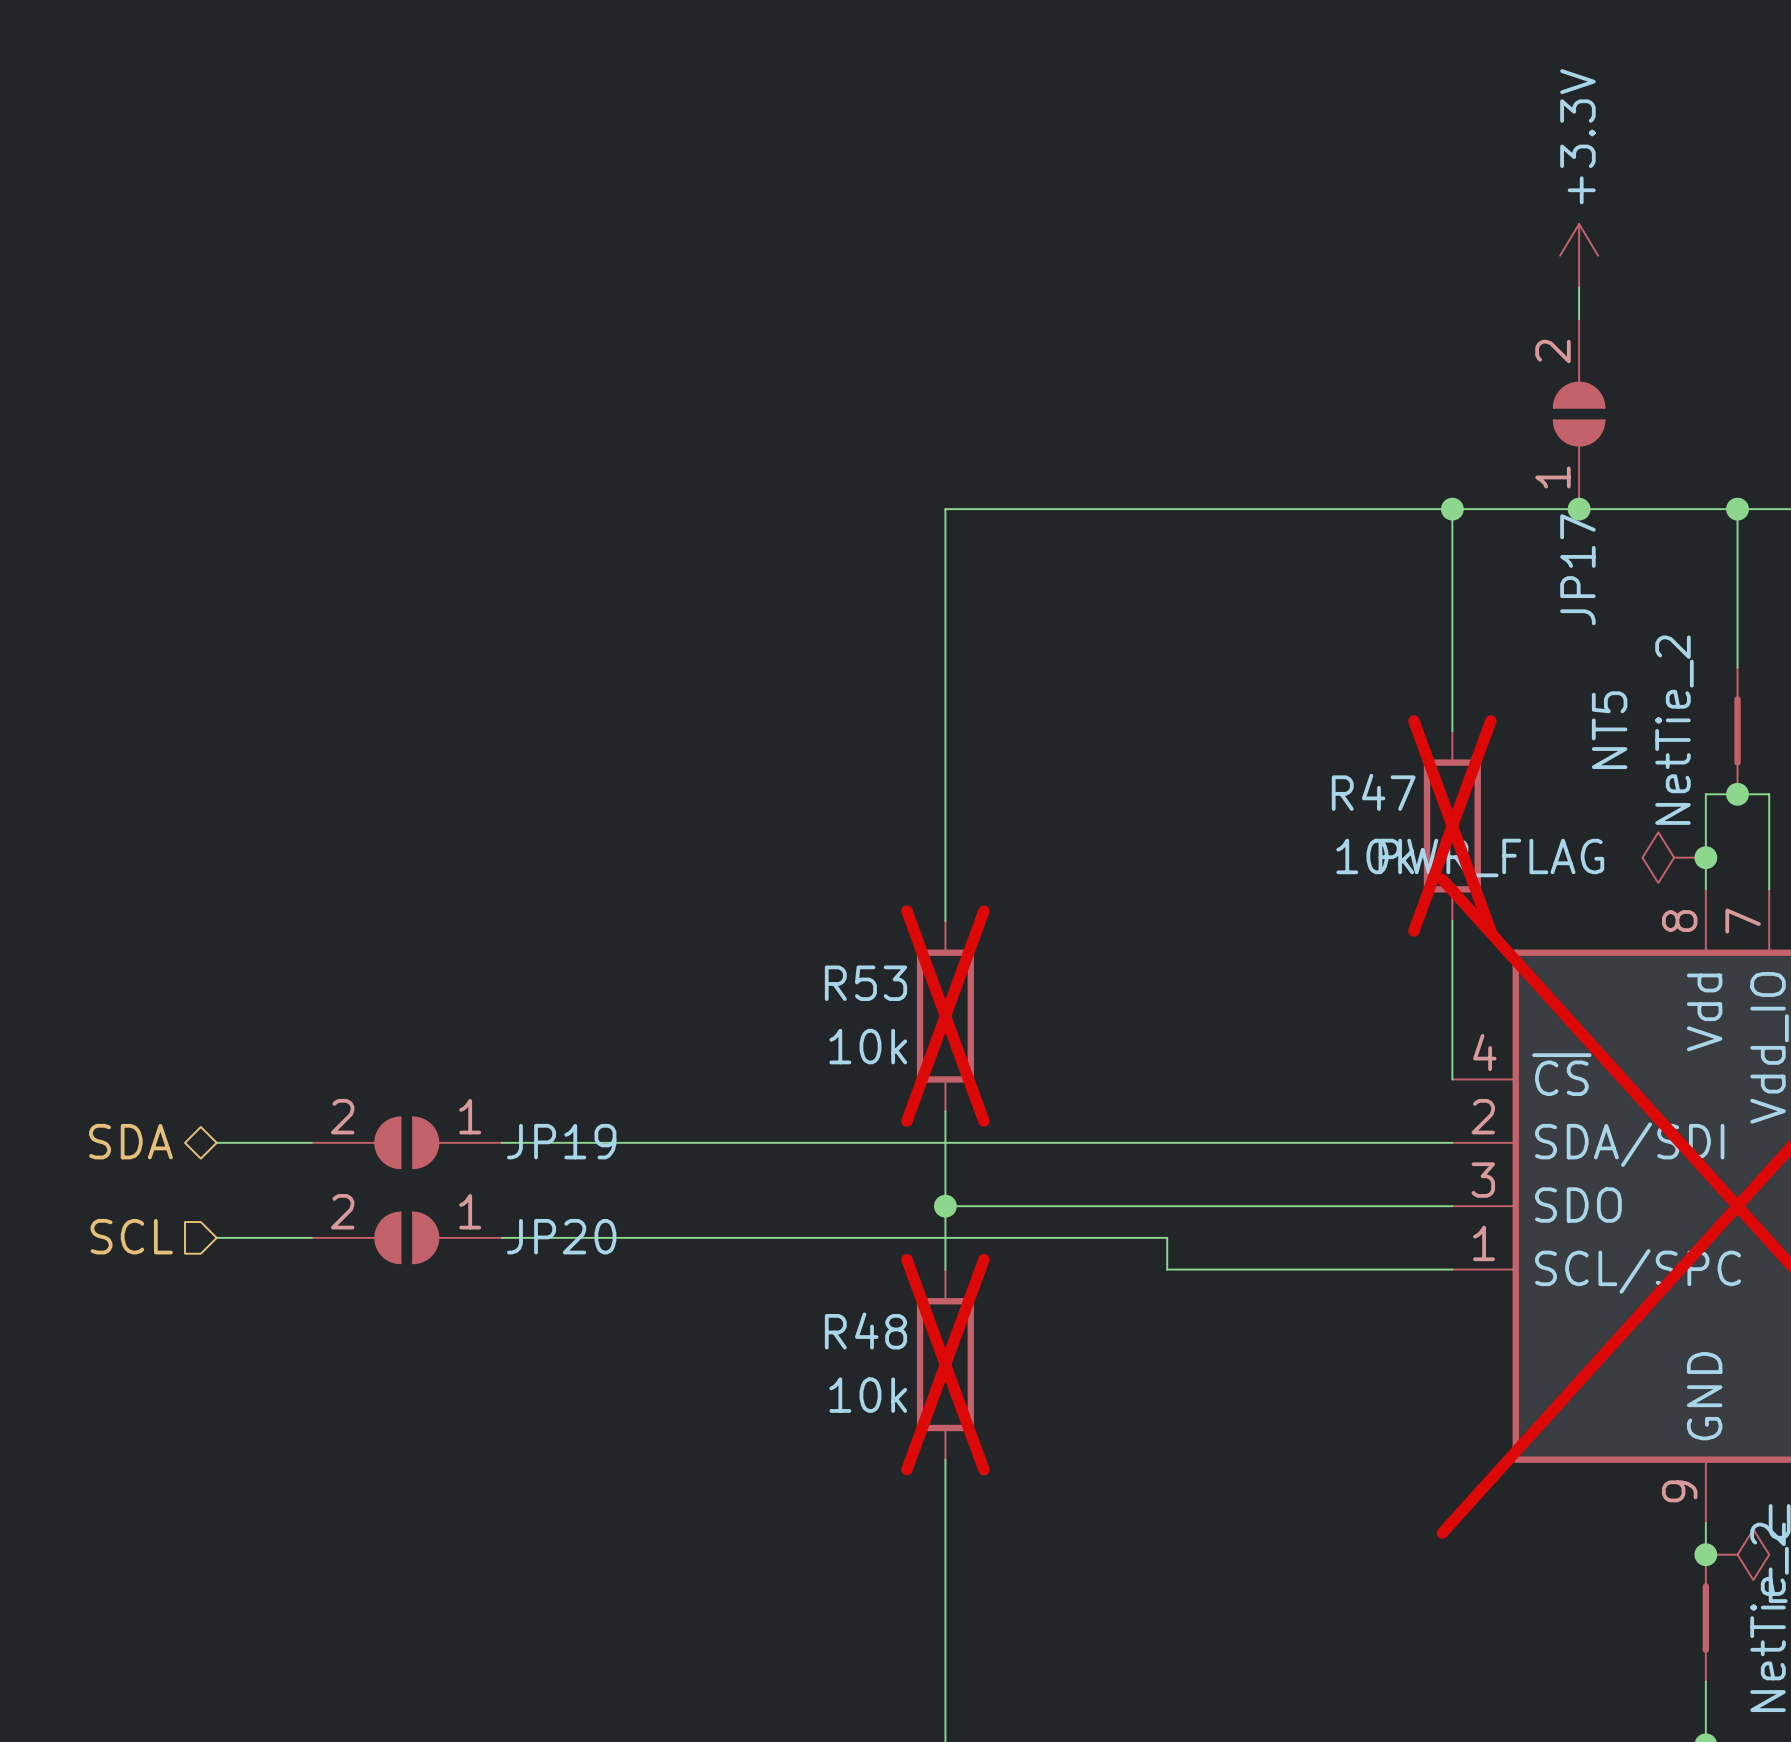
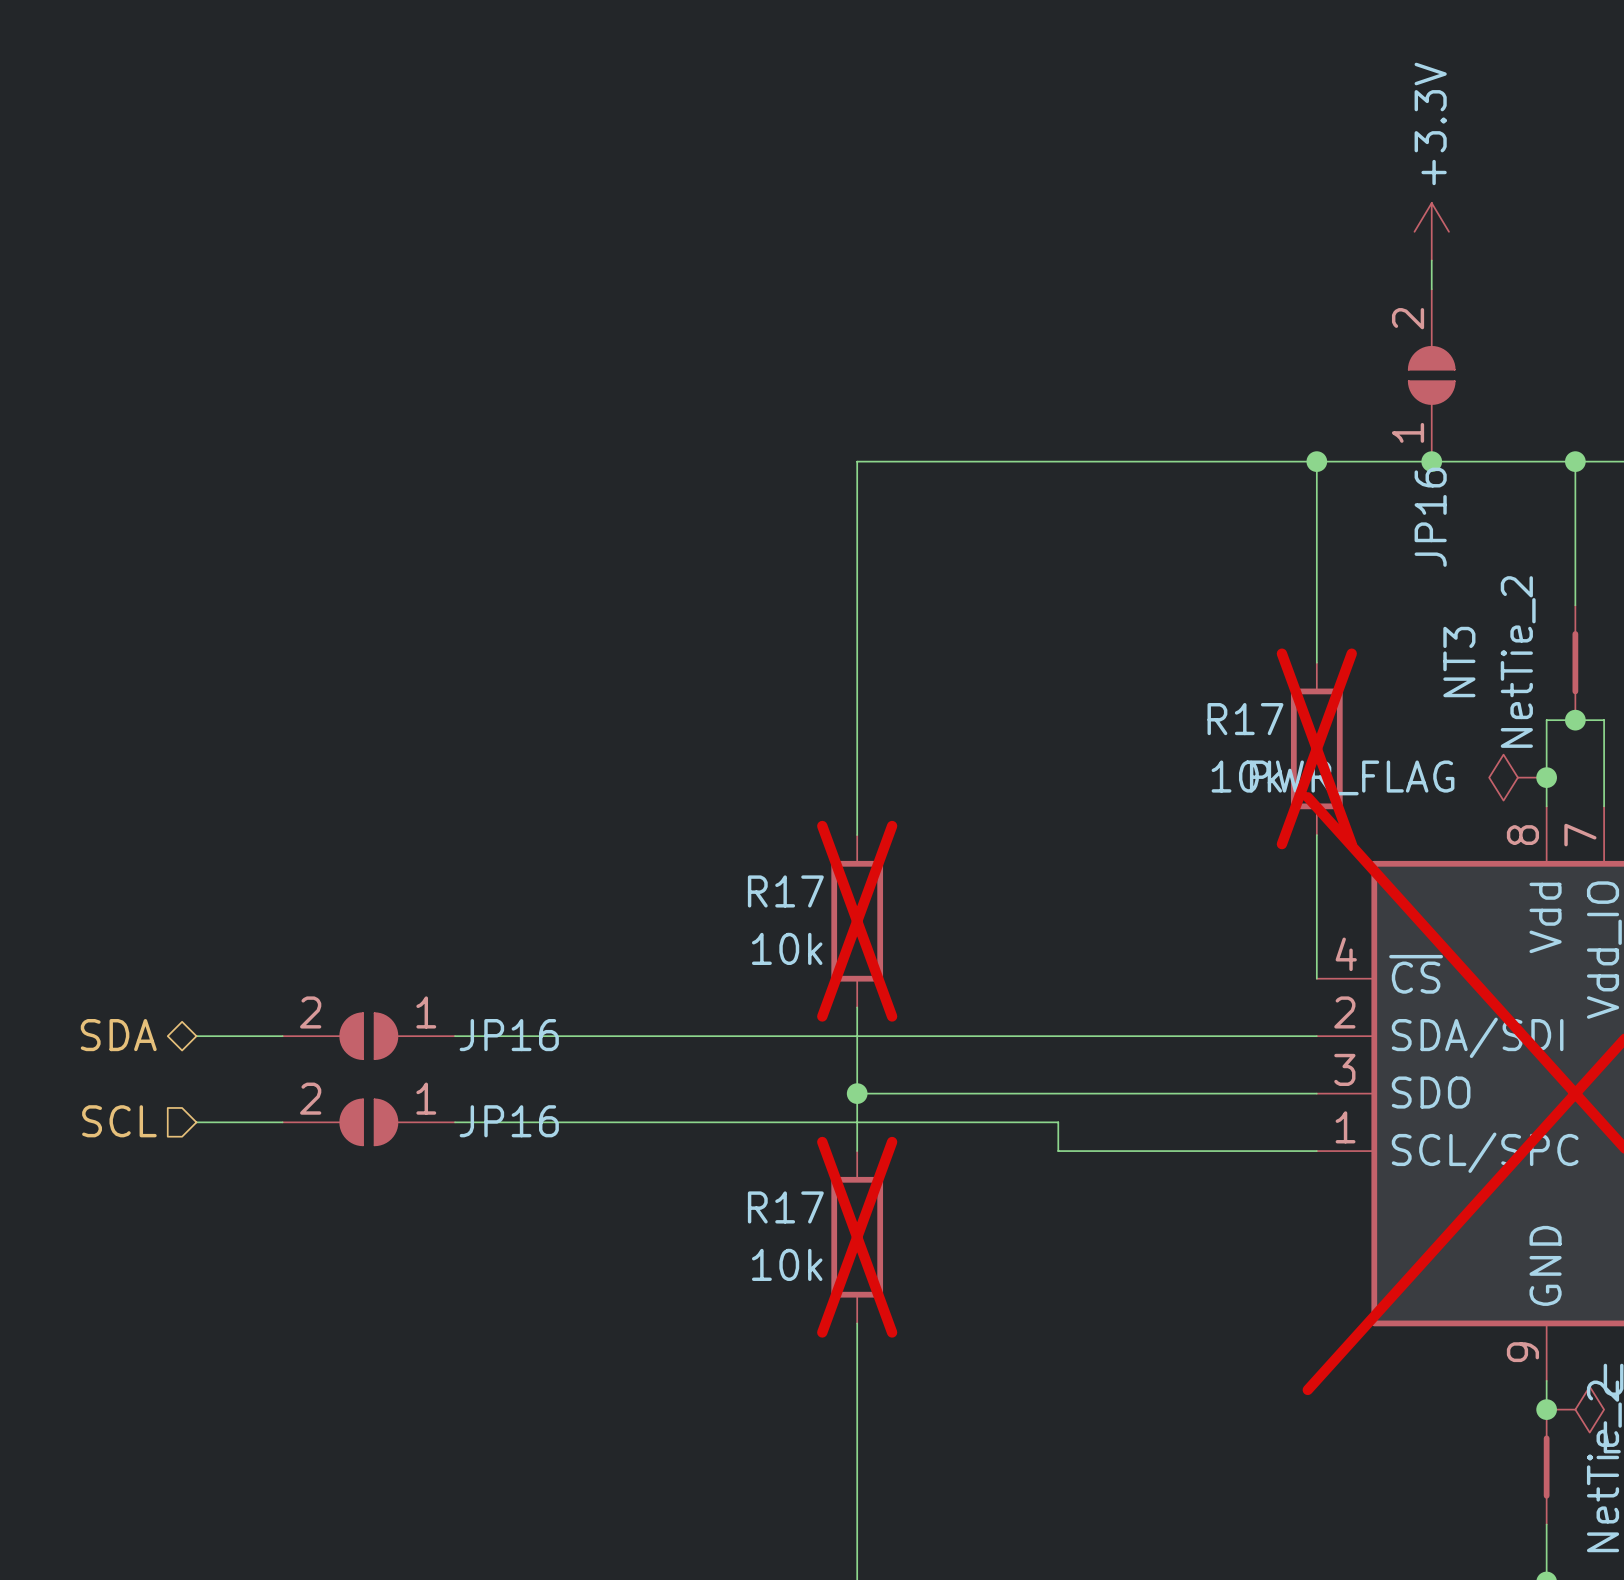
JP17 name: JP17 (1577, 569) -> JP16 (1430, 517)
NT5 name: NT5 (1609, 730) -> NT3 (1459, 662)
R47 name: R47 (1373, 792) -> R17 (1245, 719)
R53 name: R53 (865, 983) -> R17 (785, 891)
JP19 name: JP19 (561, 1141) -> JP16 (509, 1035)
JP20 name: JP20 (561, 1236) -> JP16 (509, 1121)
R48 name: R48 (865, 1330) -> R17 (785, 1207)

